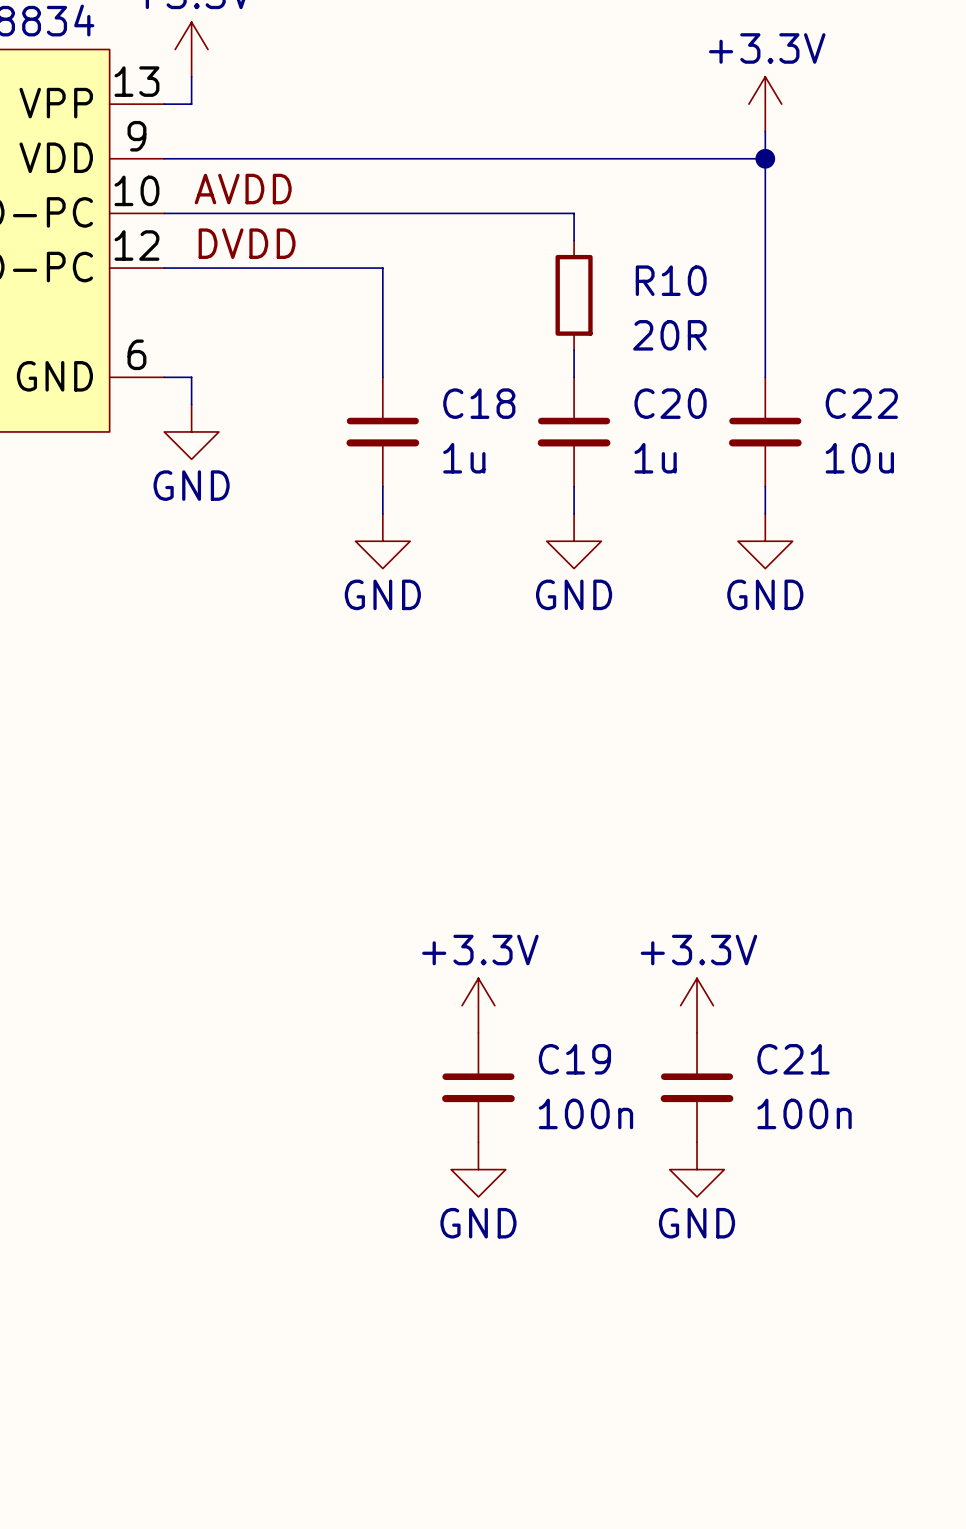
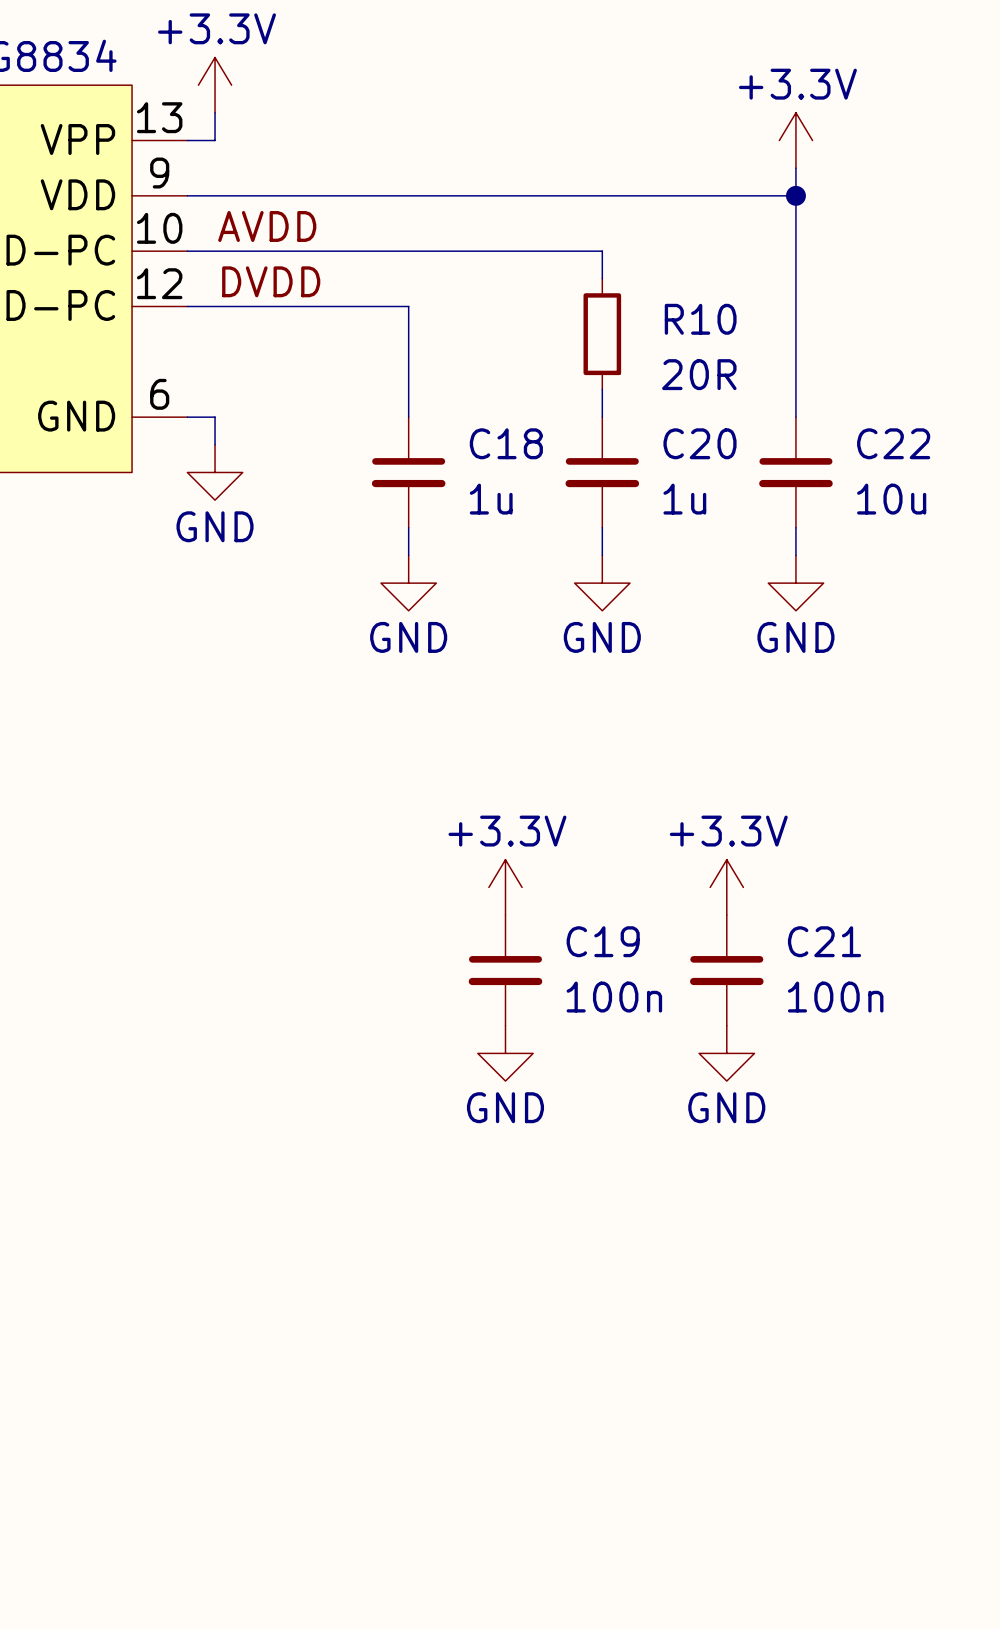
power symbol: none -> +3.3V (505, 887)
power symbol: none -> +3.3V (726, 887)
power symbol: +3.3V (478, 1005) -> GND (505, 1053)
power symbol: +3.3V (697, 1005) -> GND (726, 1053)
C19 position: (478, 1087) -> (505, 970)
C21 position: (697, 1087) -> (726, 970)
power symbol: GND (478, 1169) -> none
power symbol: GND (697, 1169) -> none

